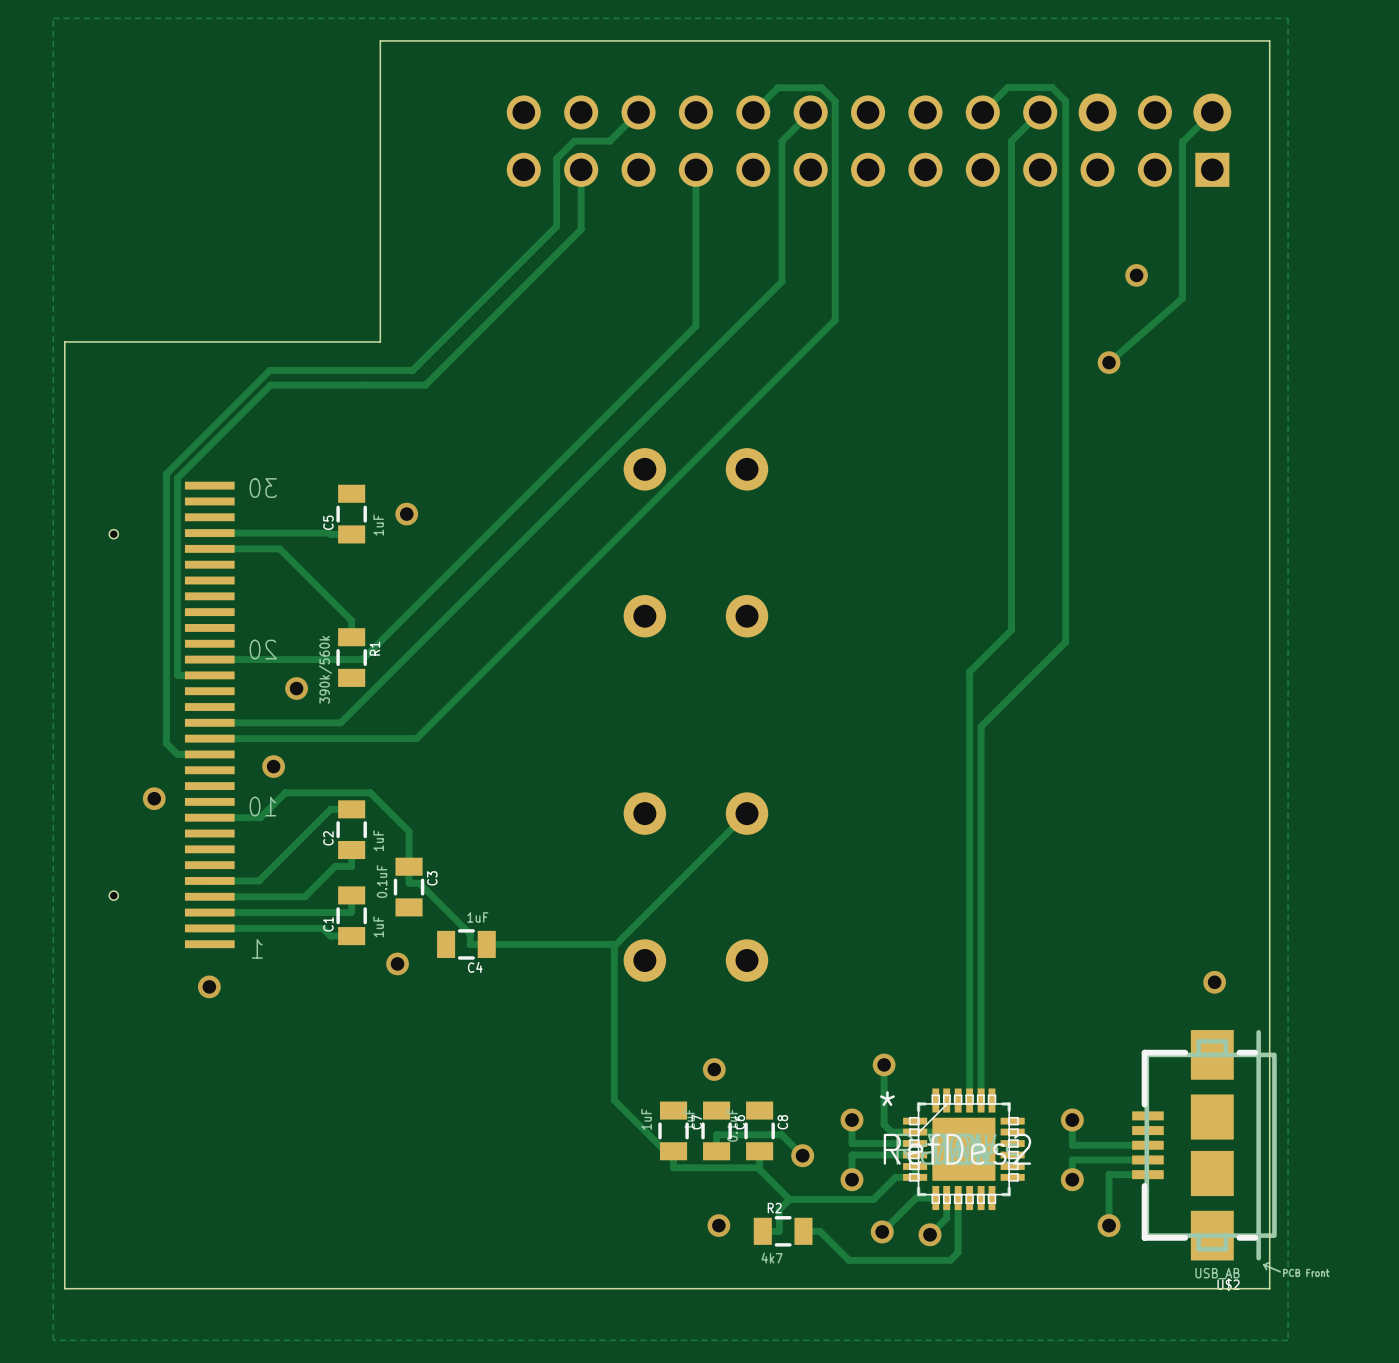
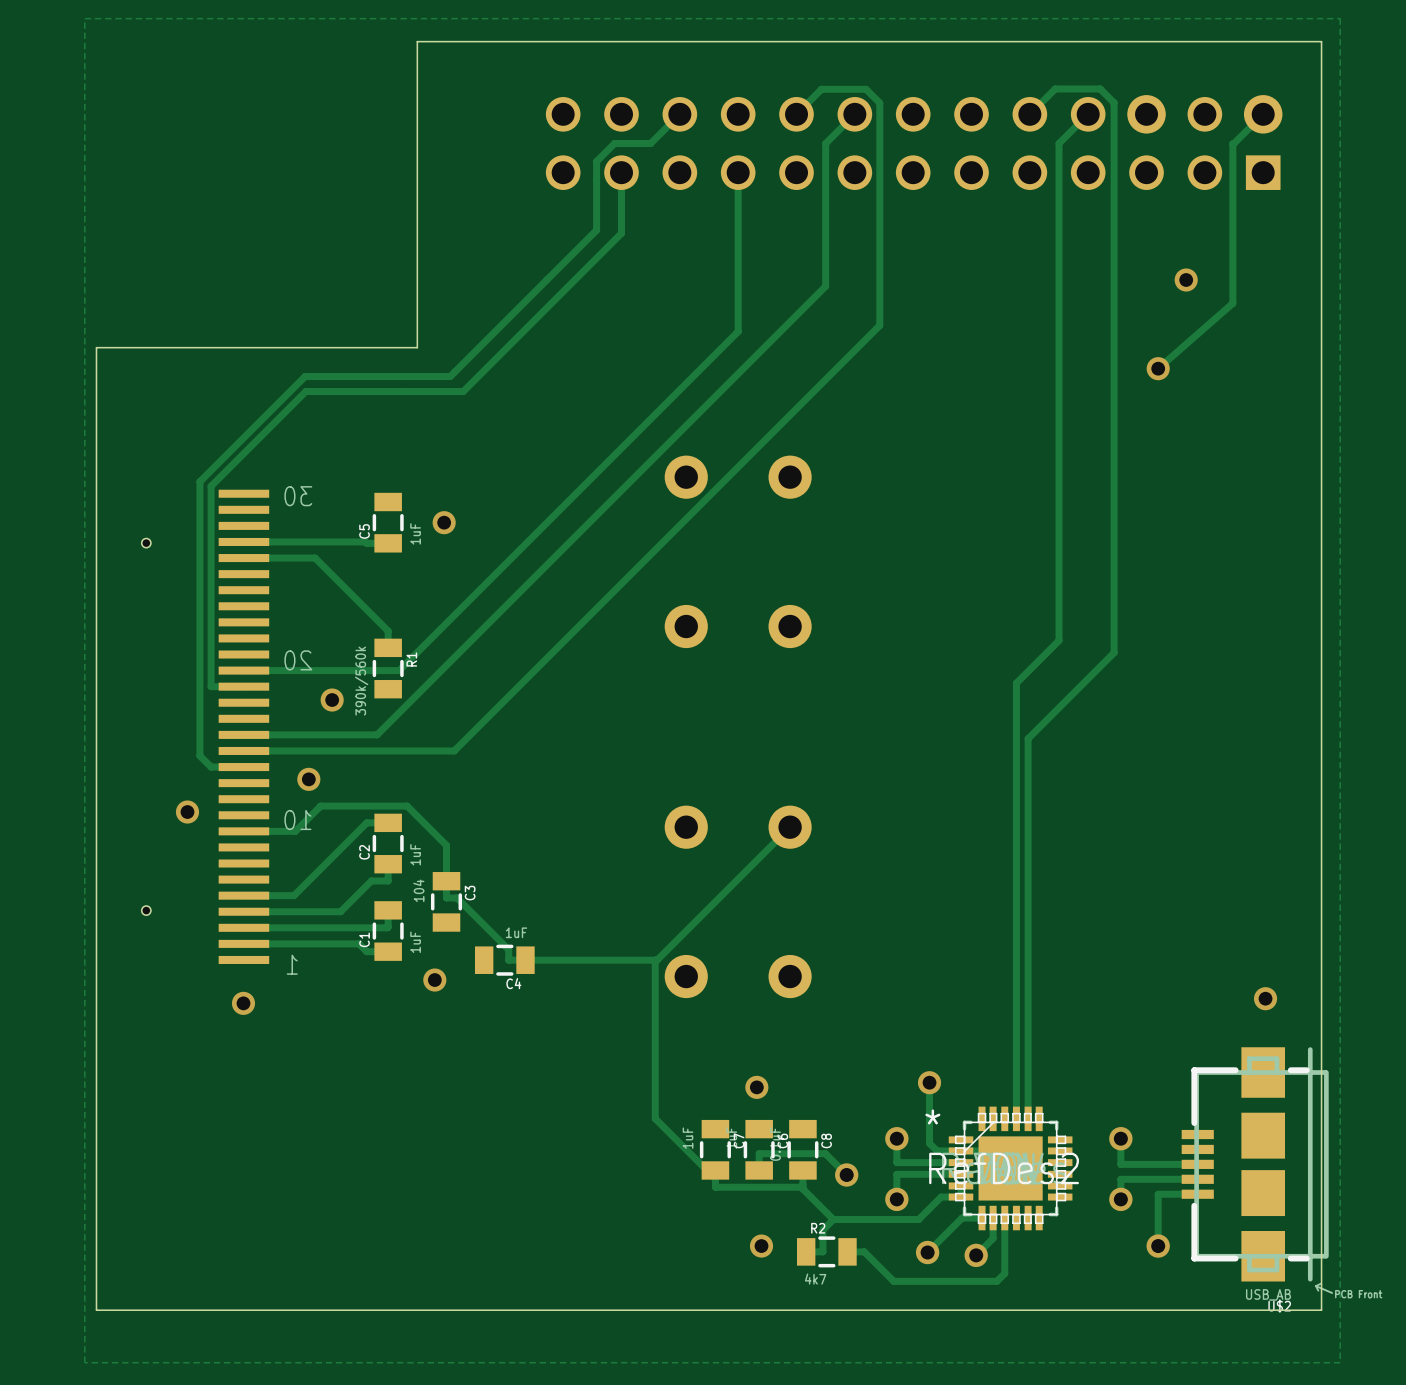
C3 value: 0.1uF (382, 881) -> 104 (418, 890)

